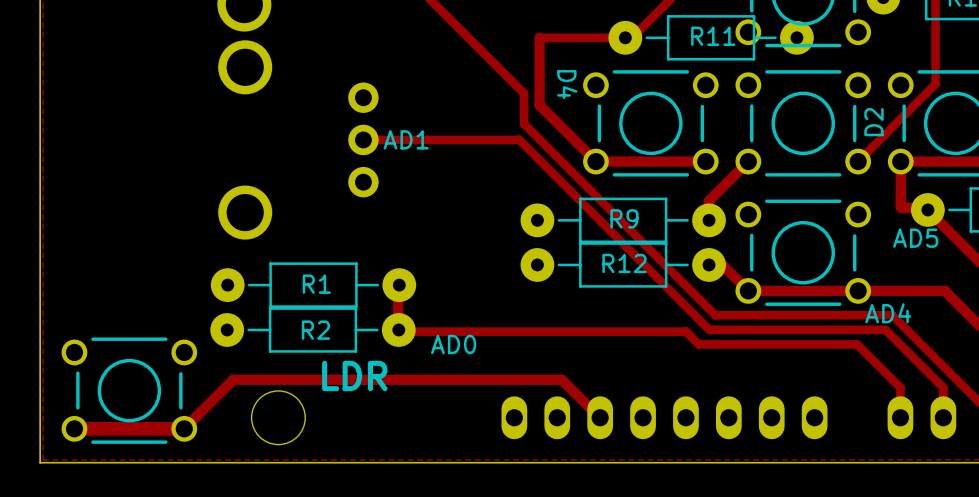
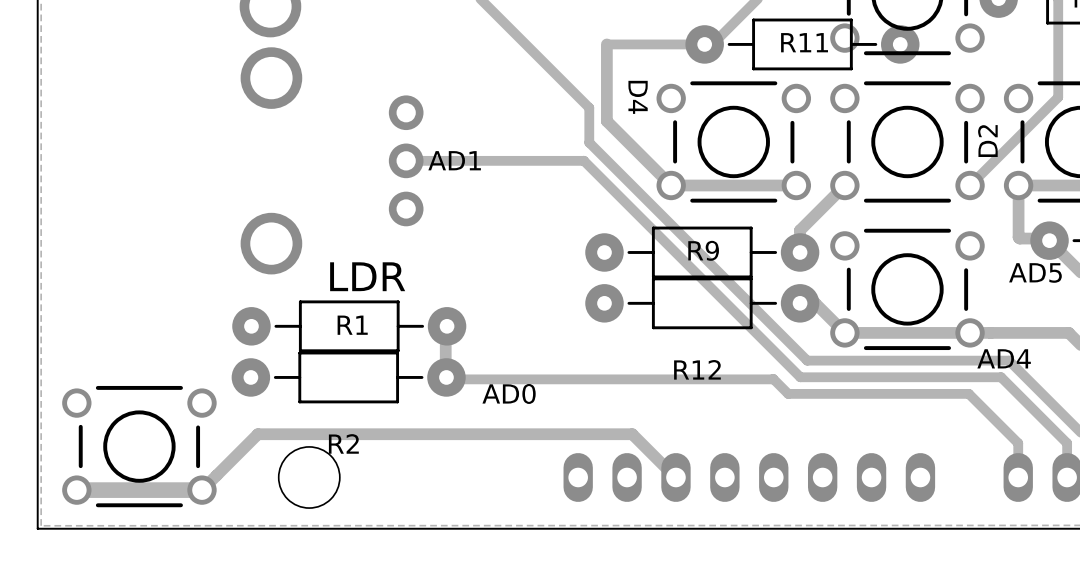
R12 name position: R12 (624, 263) -> R12 (697, 369)
R2 name position: R2 (315, 330) -> R2 (343, 443)
text position: LDR (354, 375) -> LDR (367, 276)

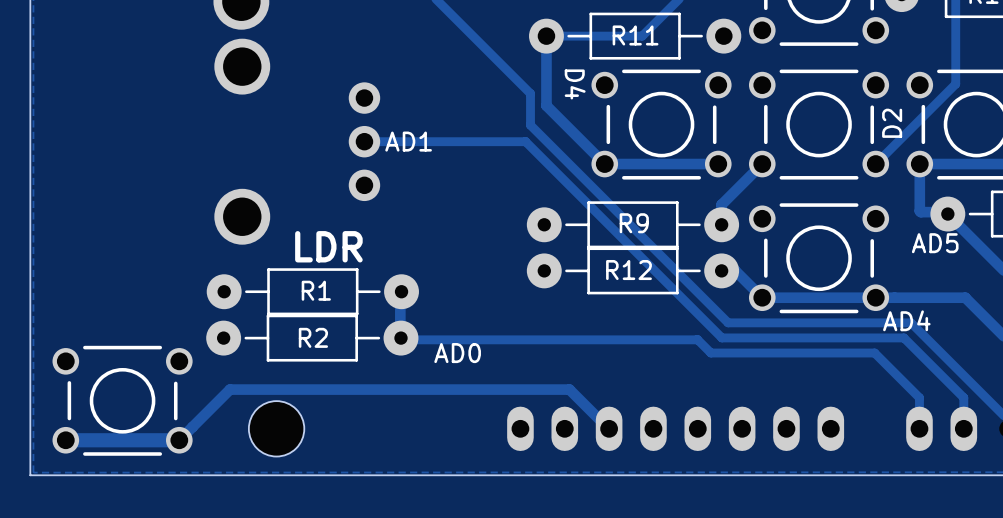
R11 footprint: [685, 18, 920, 71] -> [529, 12, 742, 60]
R12 name position: R12 (697, 369) -> R12 (628, 270)
R2 name position: R2 (343, 443) -> R2 (313, 337)

